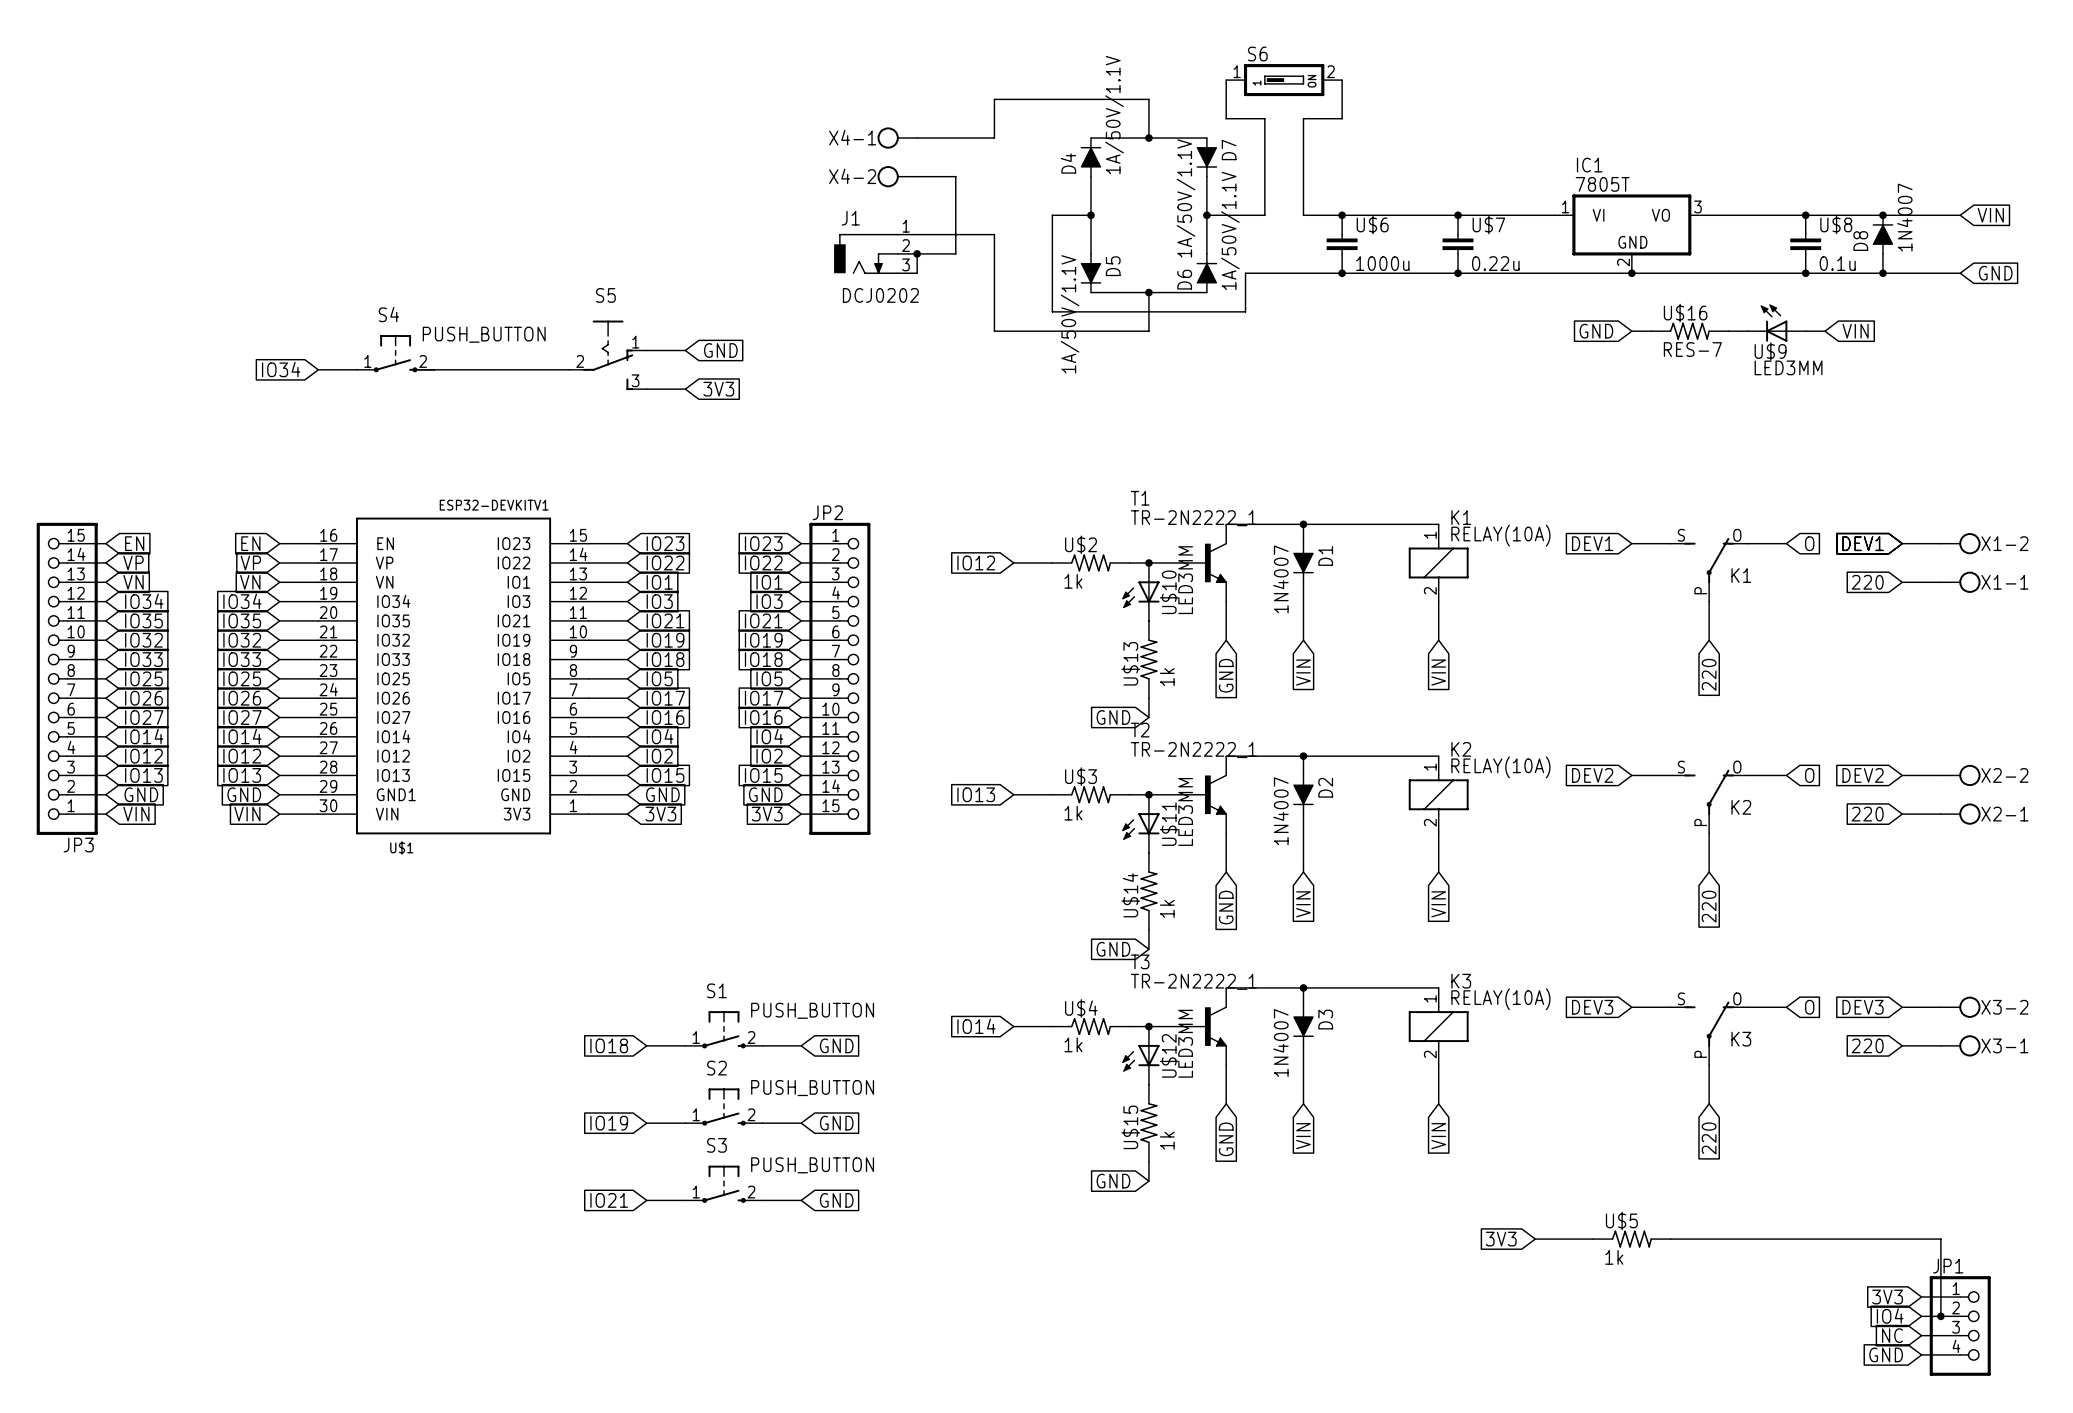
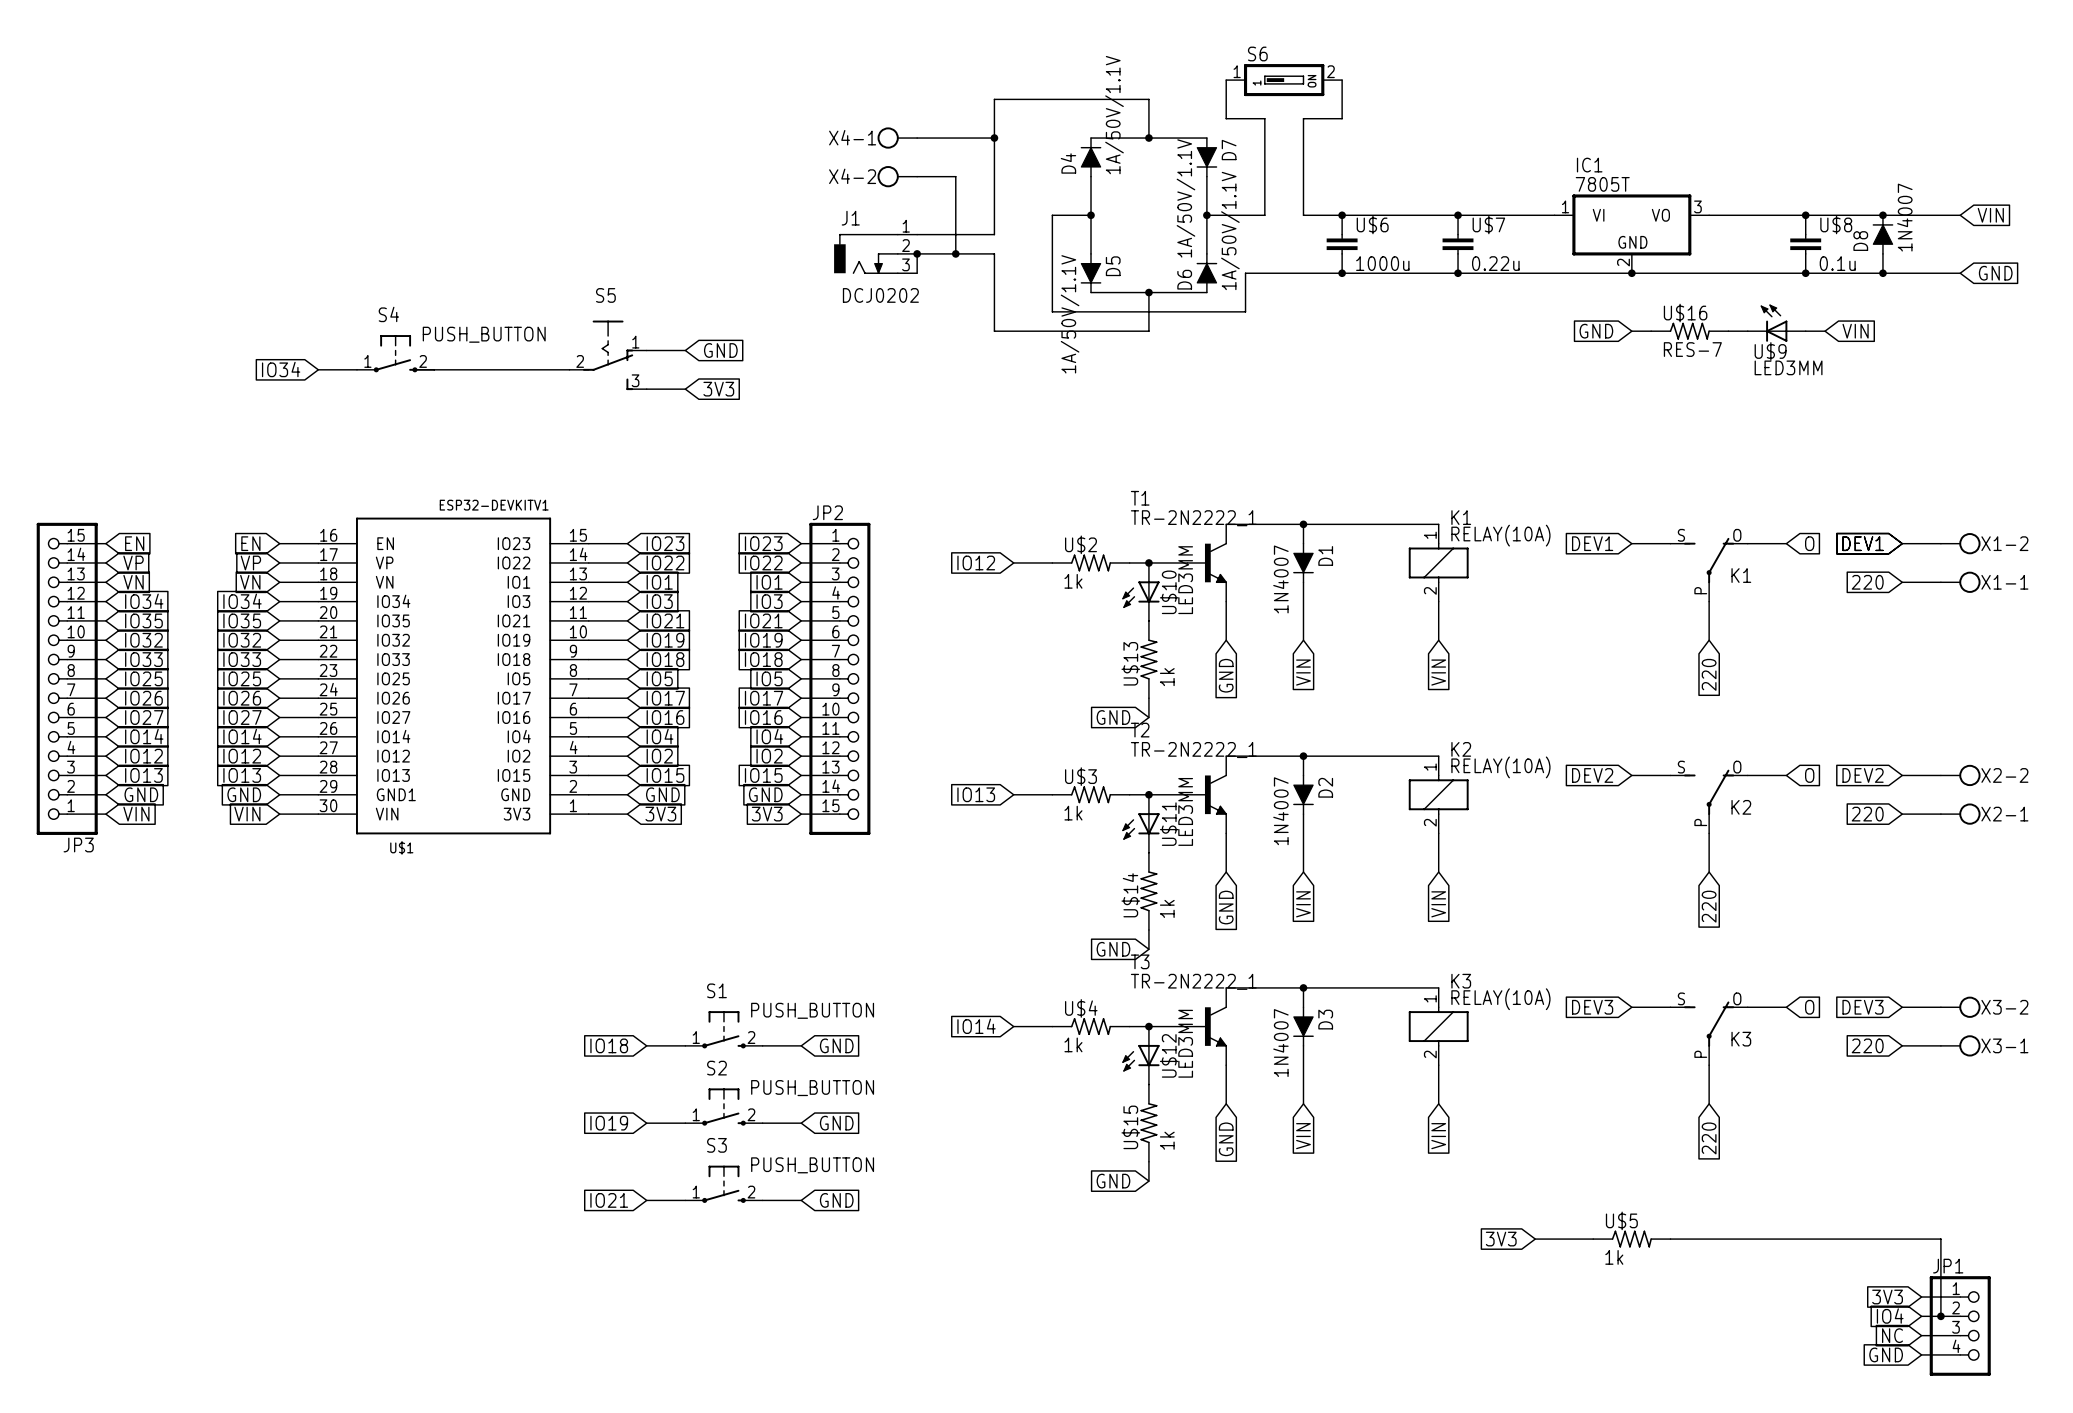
wire: none -> (994, 138) (994, 234)
junction: none -> (994, 138)
wire: (994, 234) (994, 253) -> (955, 253) (994, 253)
junction: none -> (955, 253)

